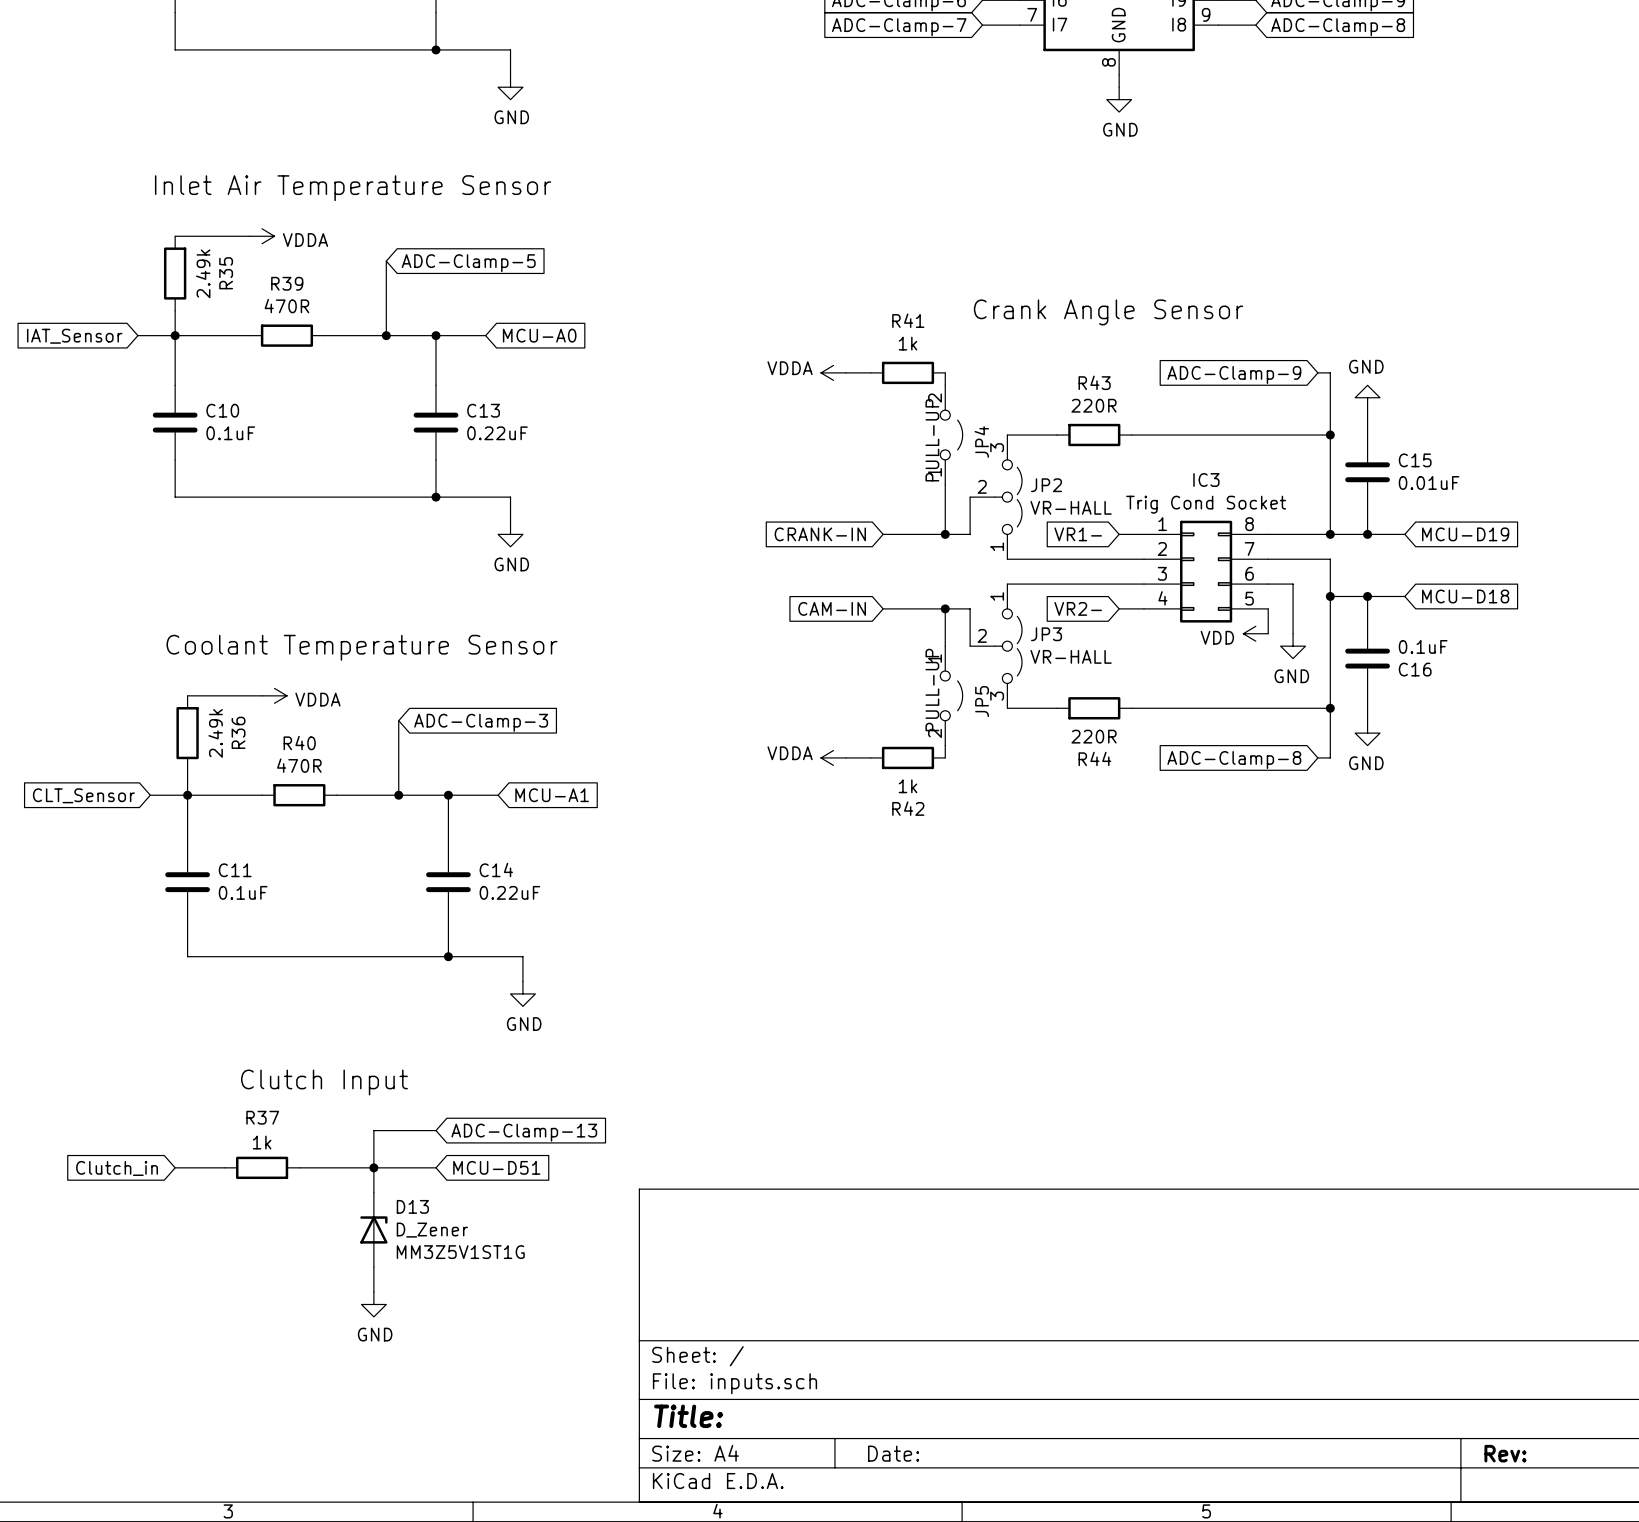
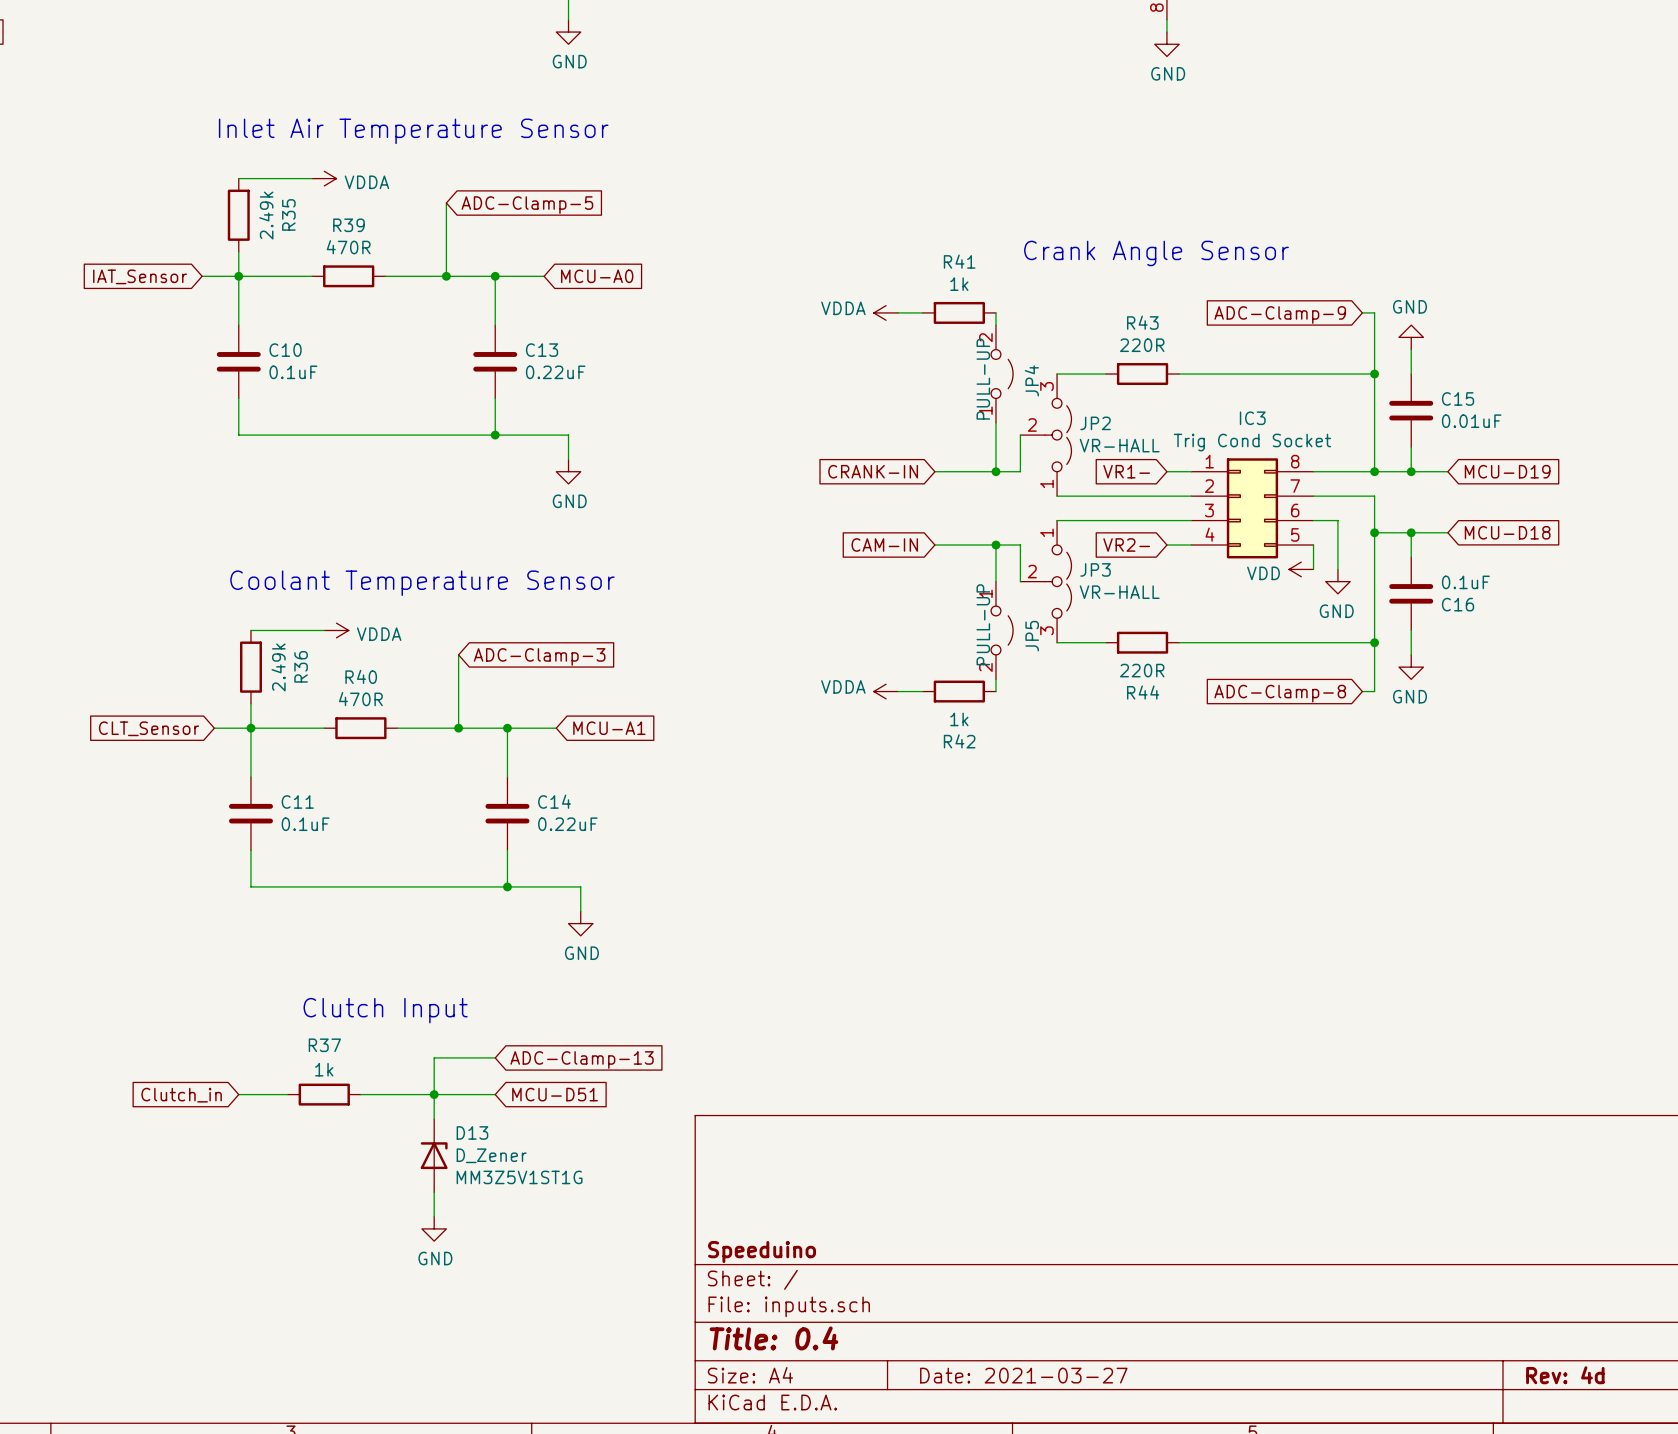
title block: none -> Speeduino (762, 1252)
title block: Title: (688, 1416) -> Title: 0.4 (773, 1338)
title block: Date: (893, 1453) -> Date: 2021-03-27 (1023, 1375)
title block: Rev: (1505, 1453) -> Rev: 4d (1565, 1375)

